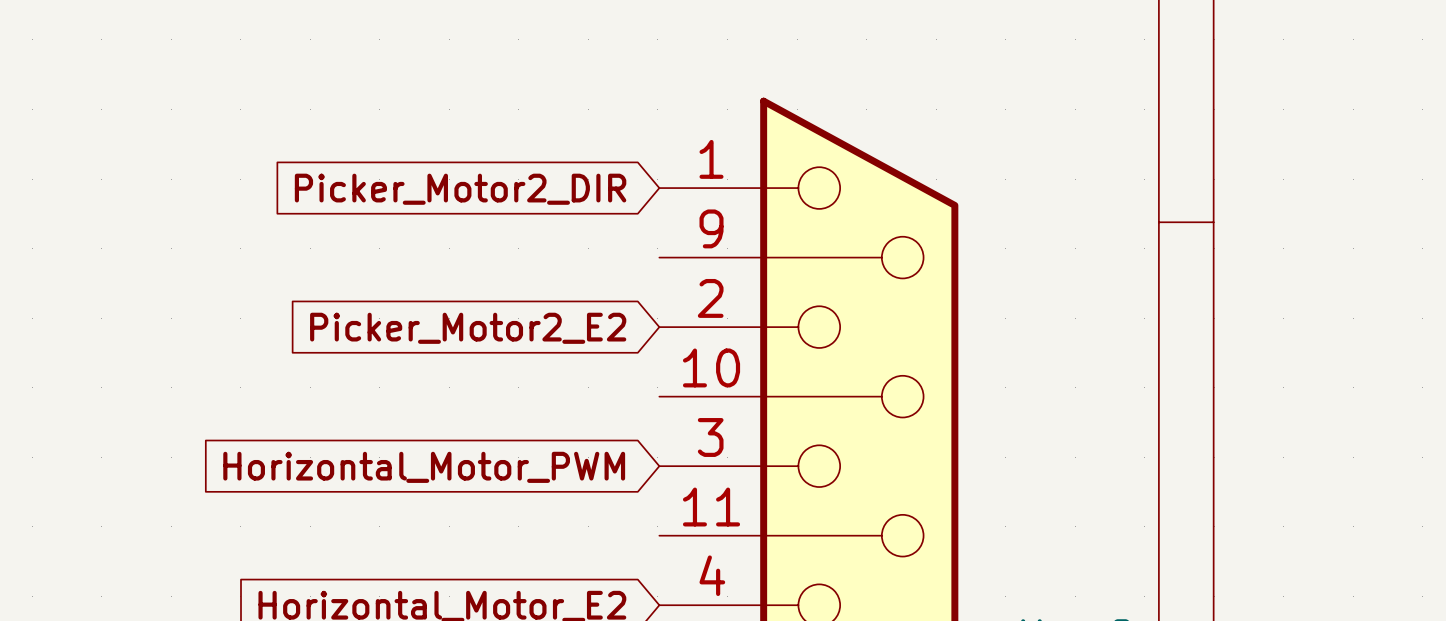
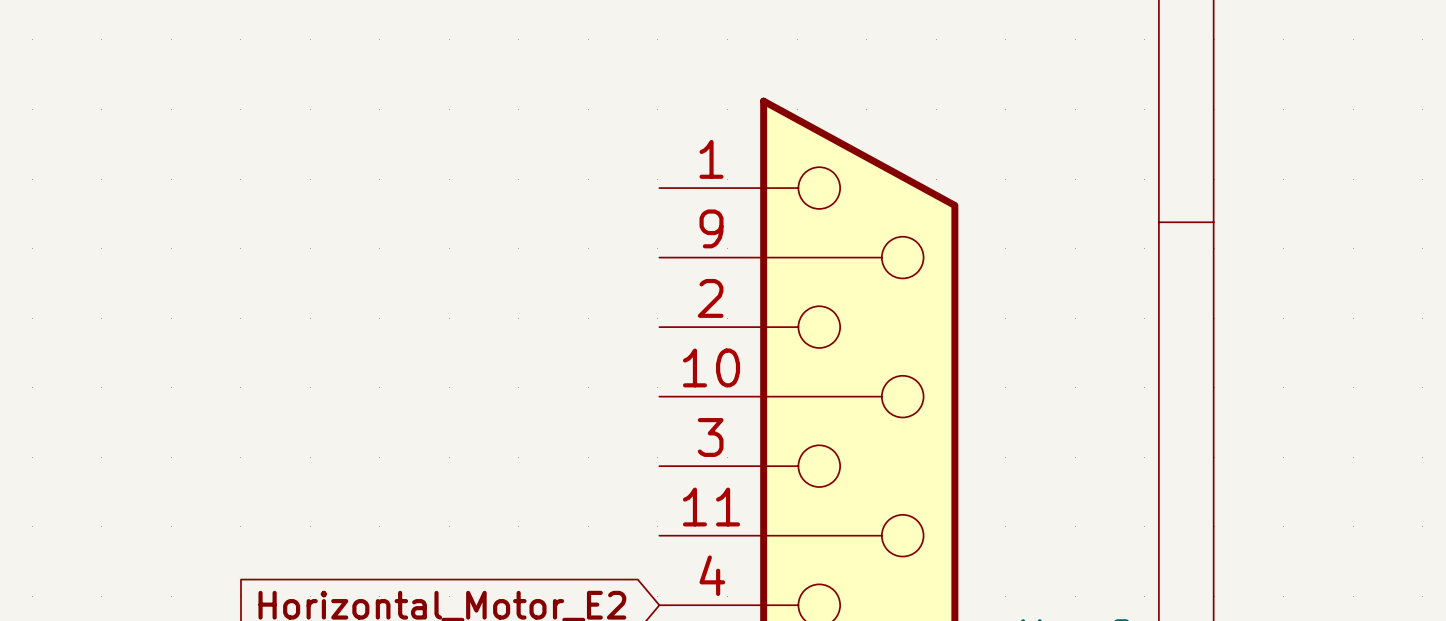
global label: Picker_Motor2_DIR (460, 189) -> none
global label: Picker_Motor2_E2 (468, 328) -> none
global label: Horizontal_Motor_PWM (424, 467) -> none

